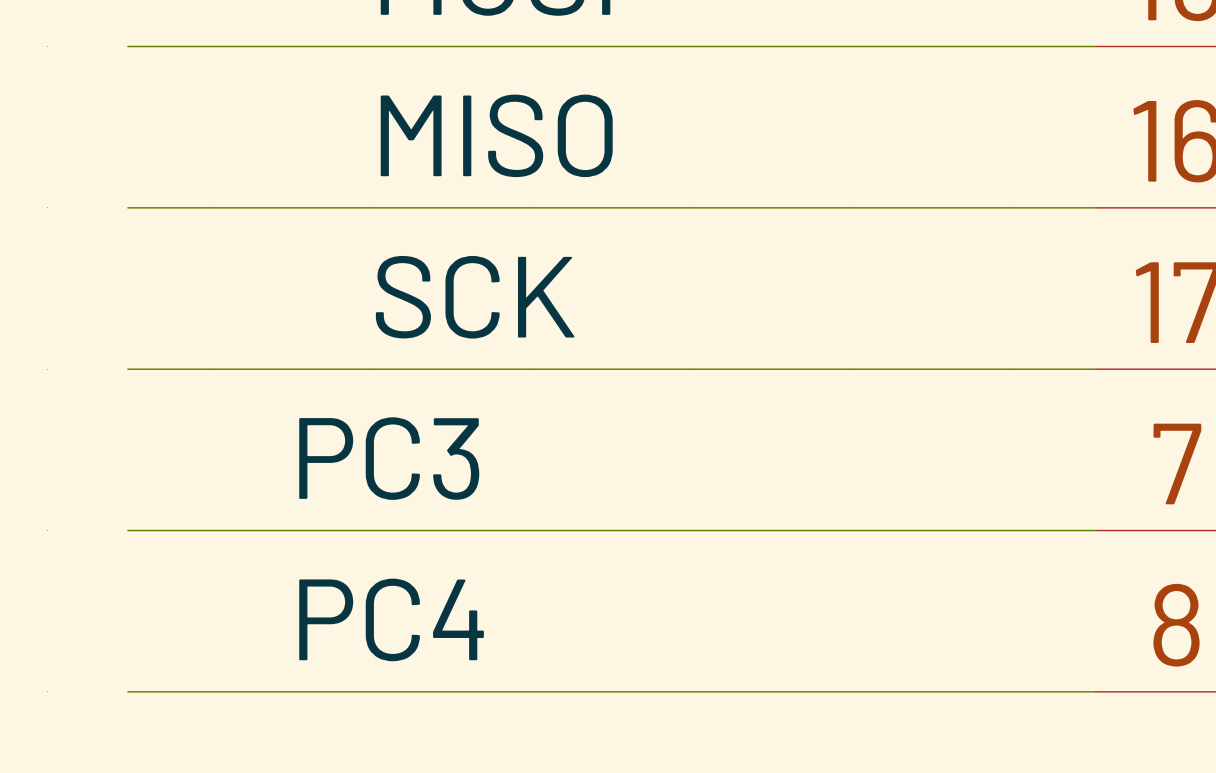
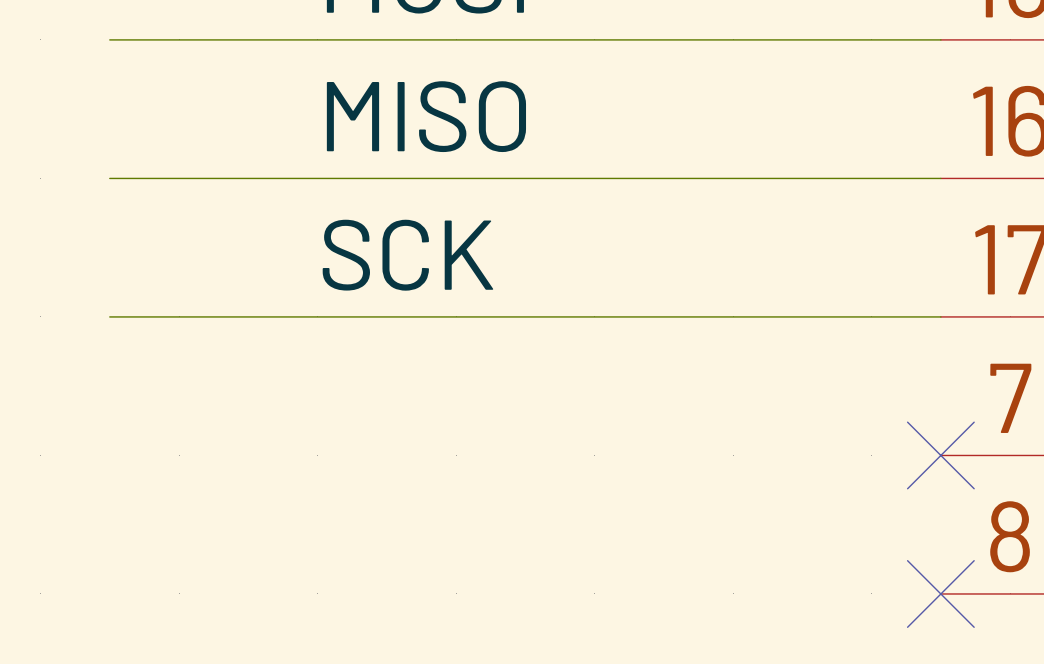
label: PC3 (389, 458) -> none
wire: (127, 530) (1095, 530) -> none
no-connect mark: none -> (940, 455)
label: PC4 (391, 619) -> none
wire: (127, 691) (1095, 691) -> none
no-connect mark: none -> (940, 593)

